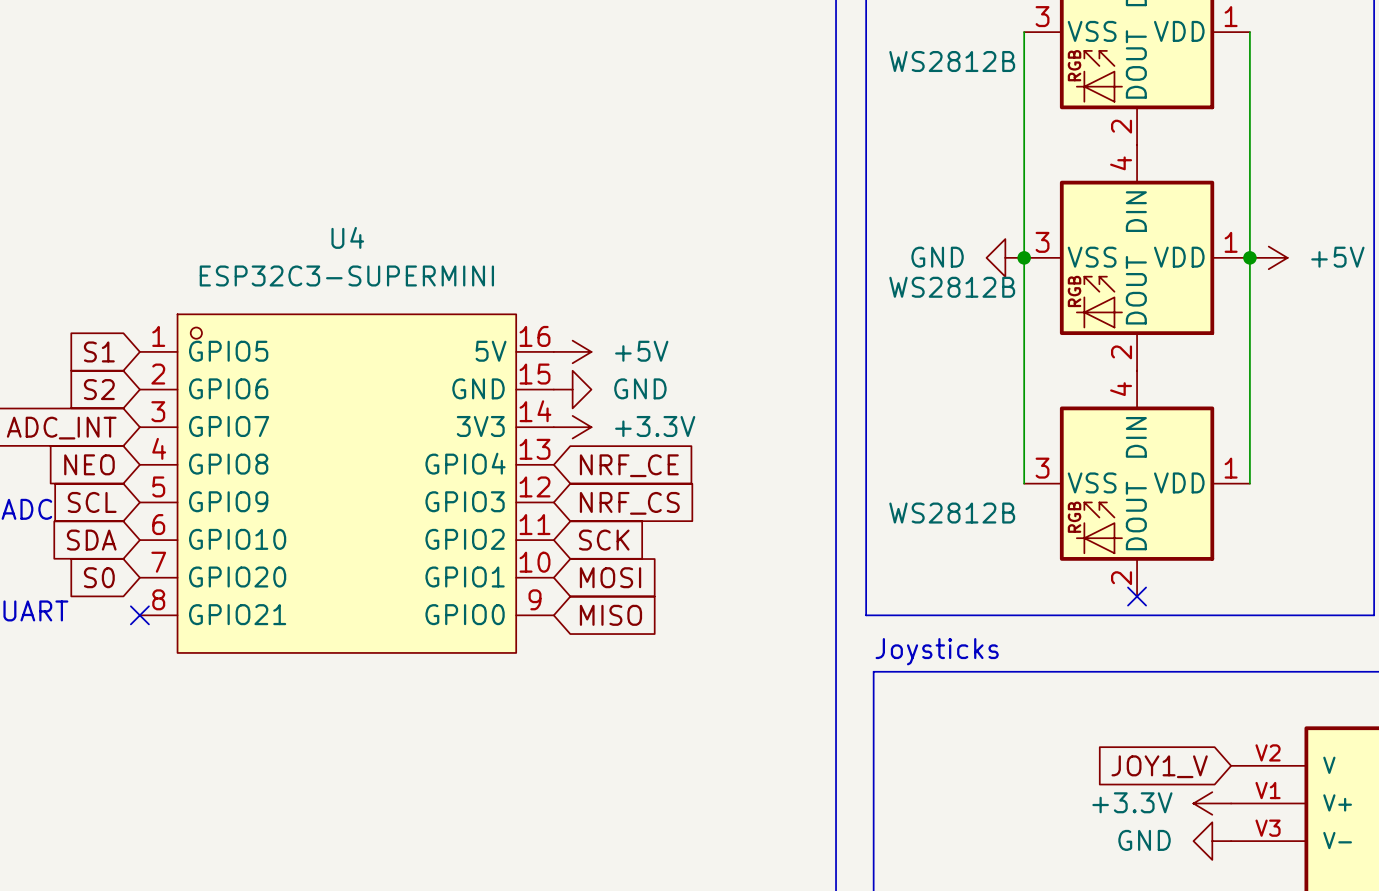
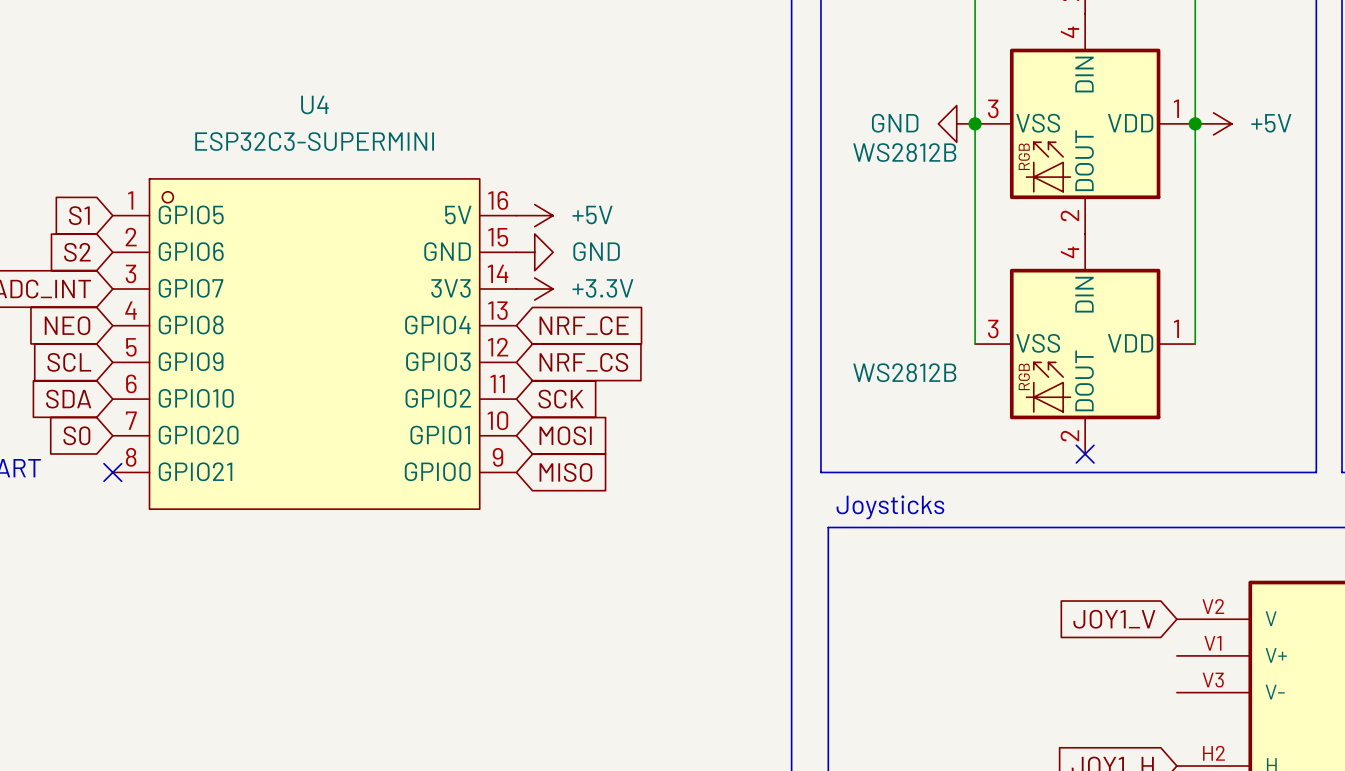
power symbol: +3.3V (1212, 803) -> none
power symbol: GND (1212, 841) -> none

